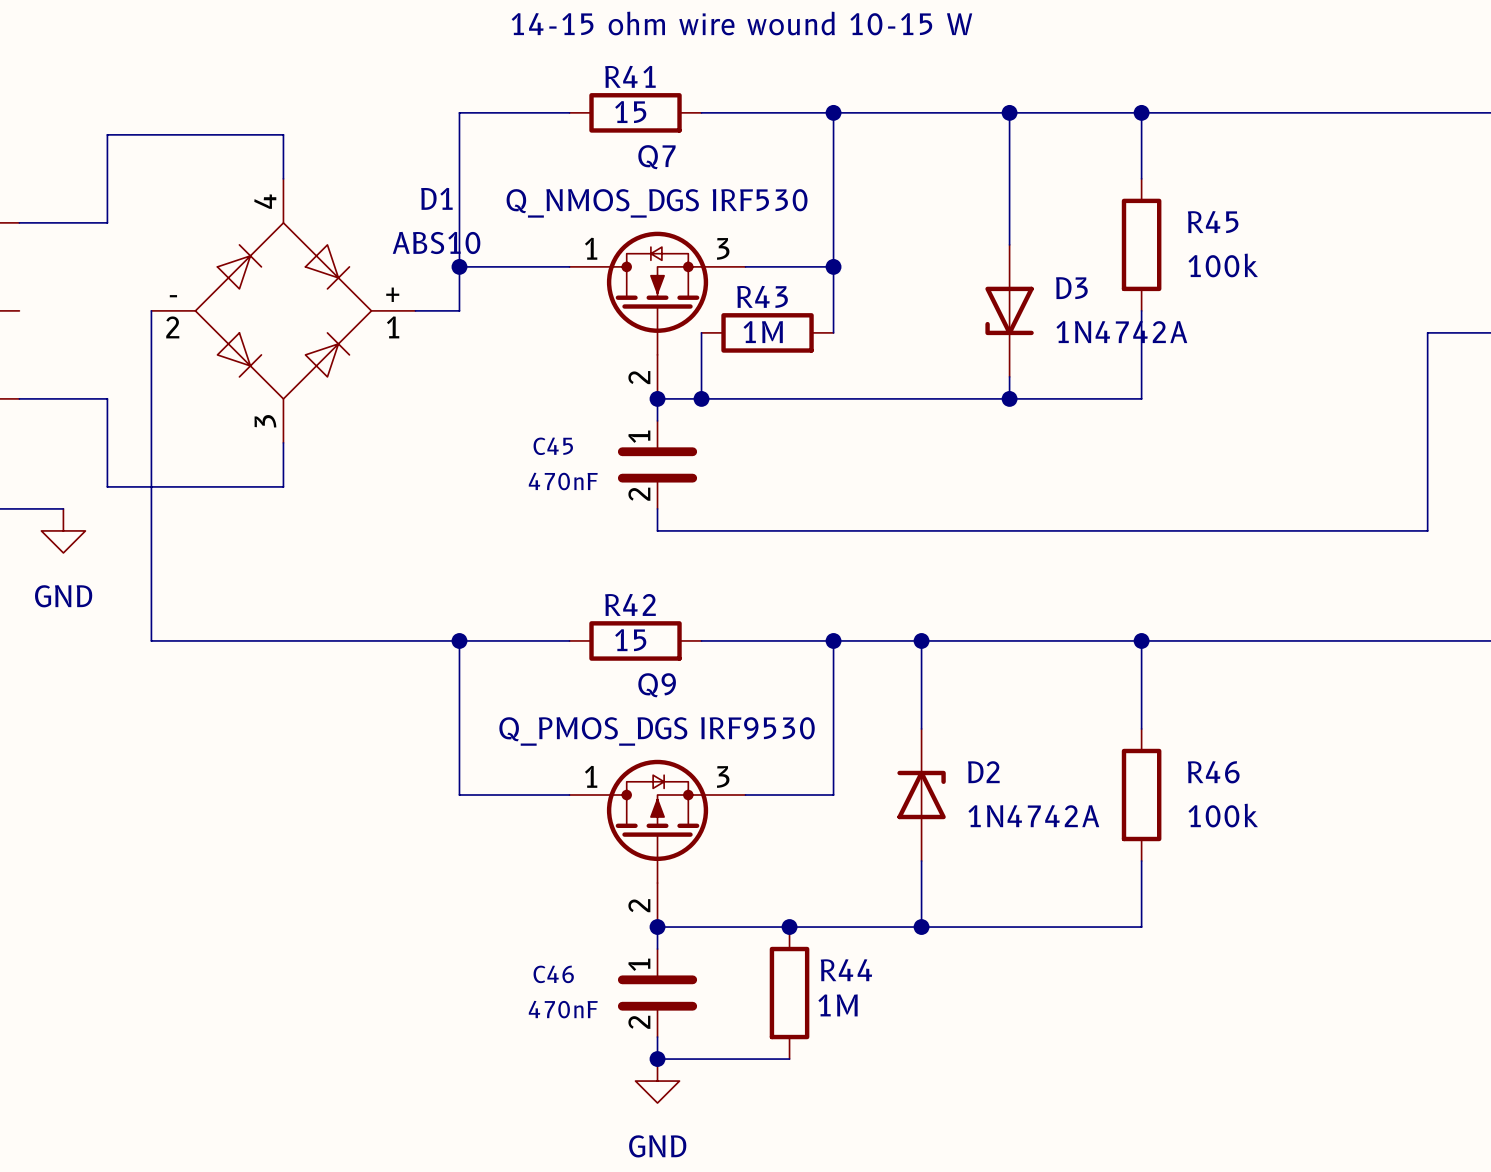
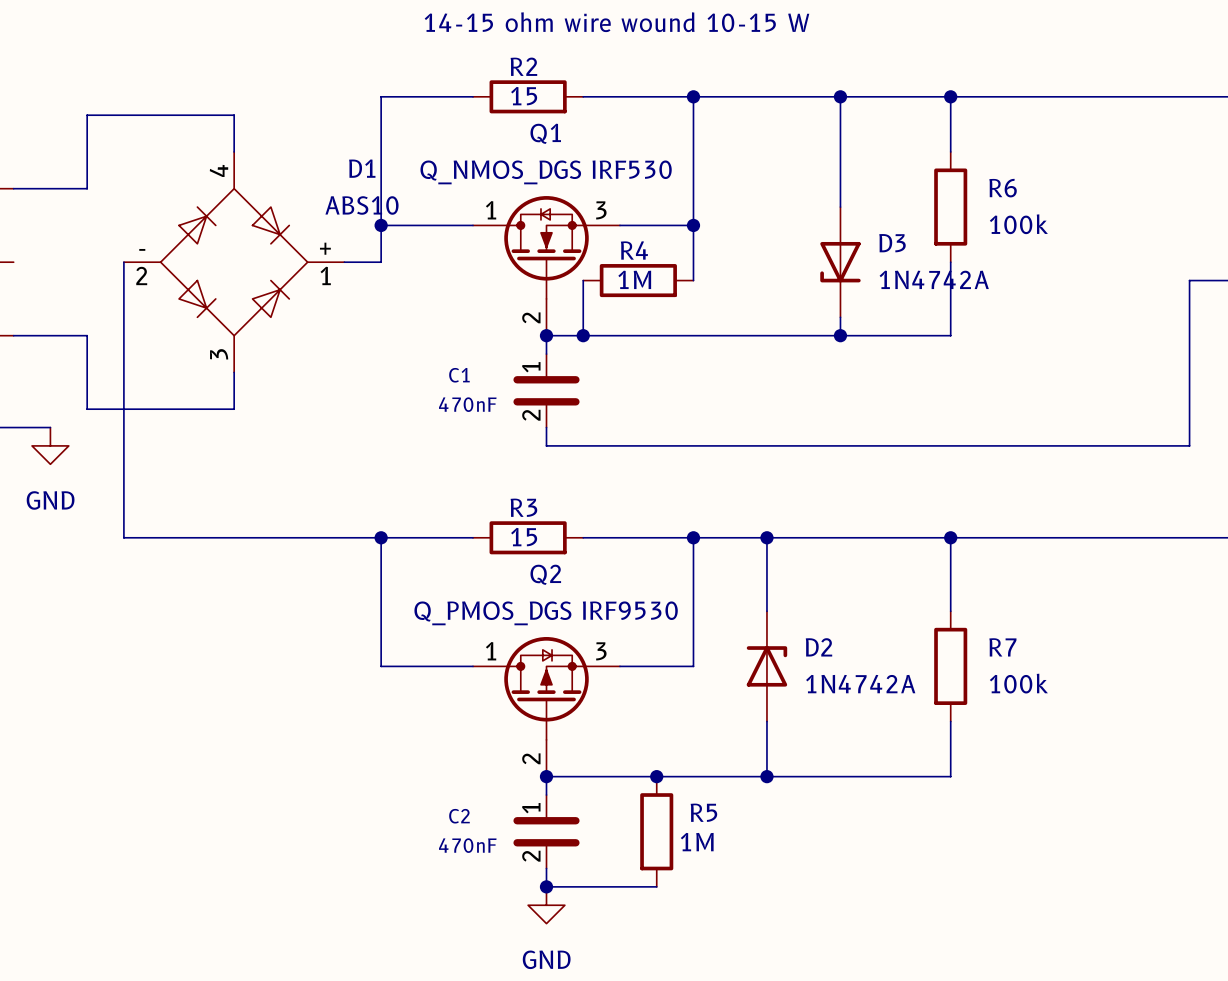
R41 name: R41 (630, 76) -> R2 (523, 66)
Q7 name: Q7 (656, 157) -> Q1 (545, 133)
R45 name: R45 (1213, 222) -> R6 (1003, 188)
R43 name: R43 (762, 296) -> R4 (634, 250)
C45 name: C45 (553, 446) -> C1 (459, 375)
R42 name: R42 (630, 604) -> R3 (523, 507)
Q9 name: Q9 (657, 685) -> Q2 (545, 574)
R46 name: R46 (1213, 772) -> R7 (1002, 647)
R44 name: R44 (846, 970) -> R5 (703, 812)
C46 name: C46 (553, 974) -> C2 (459, 816)

